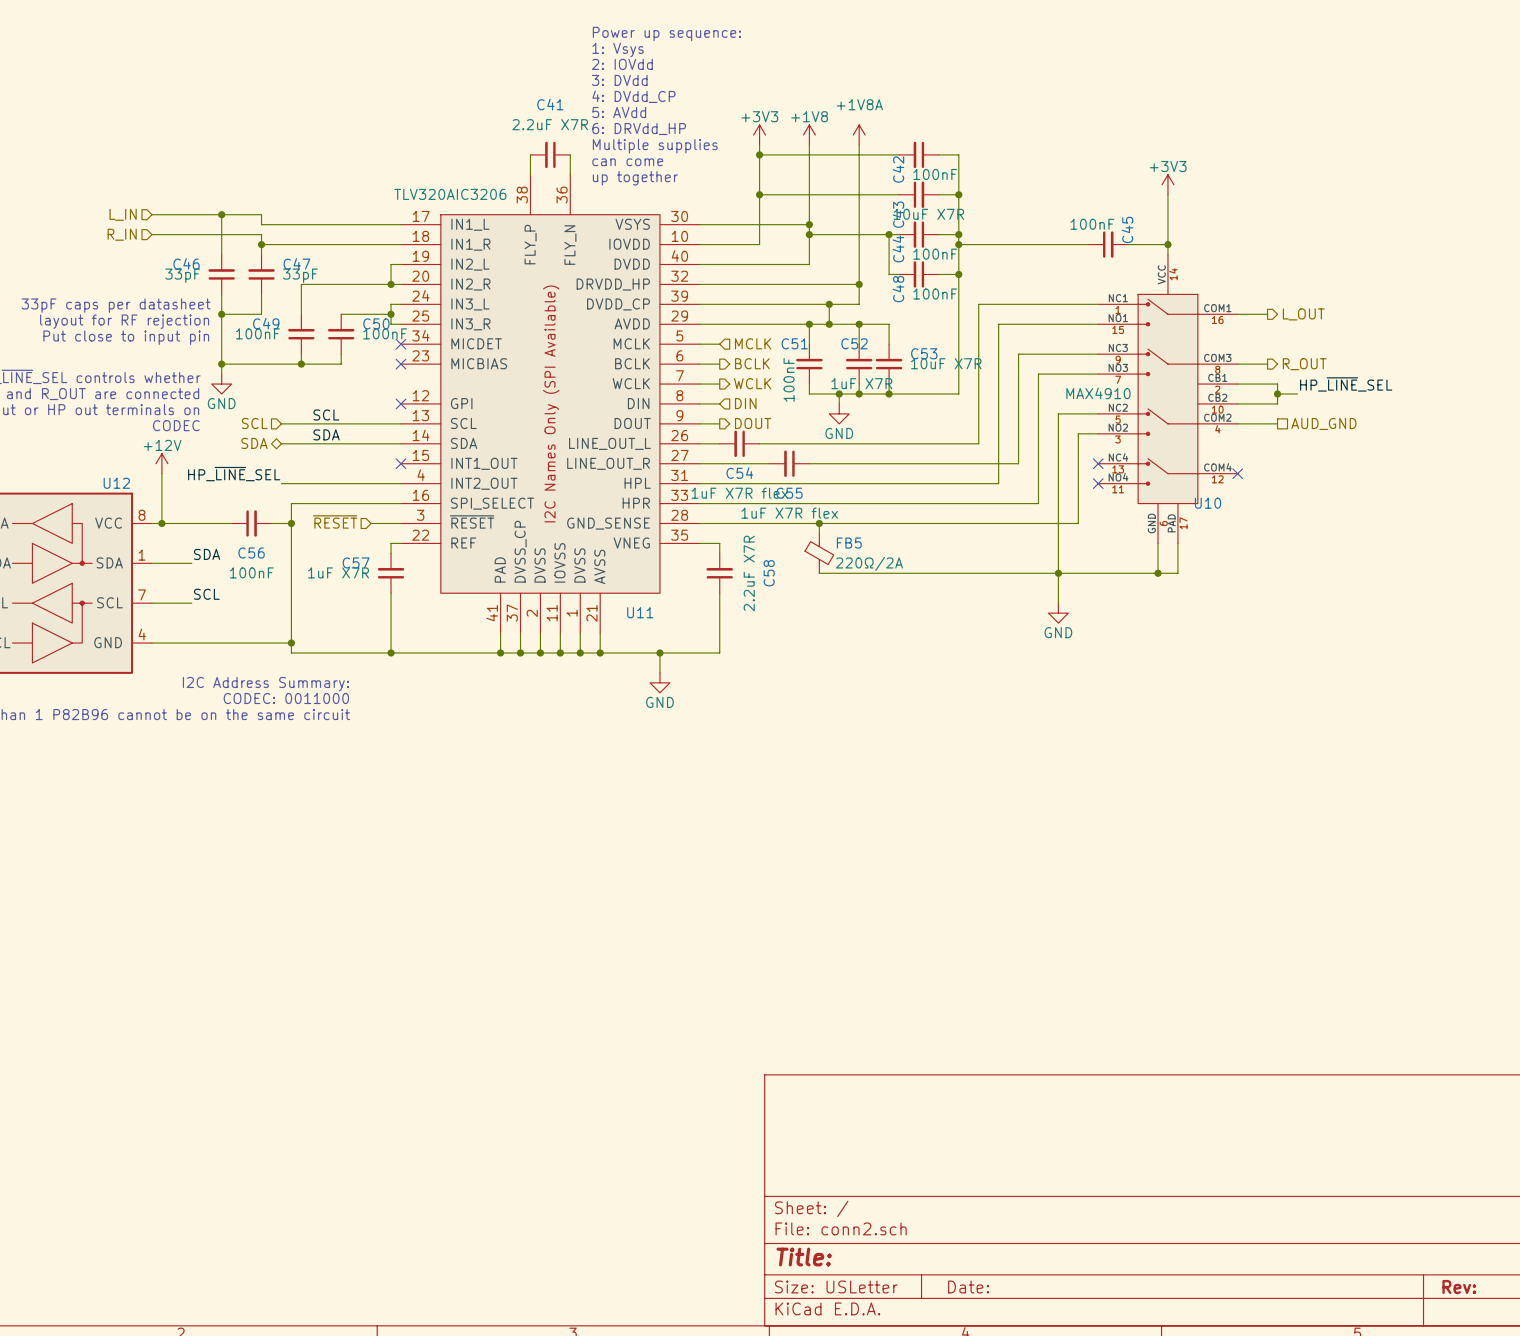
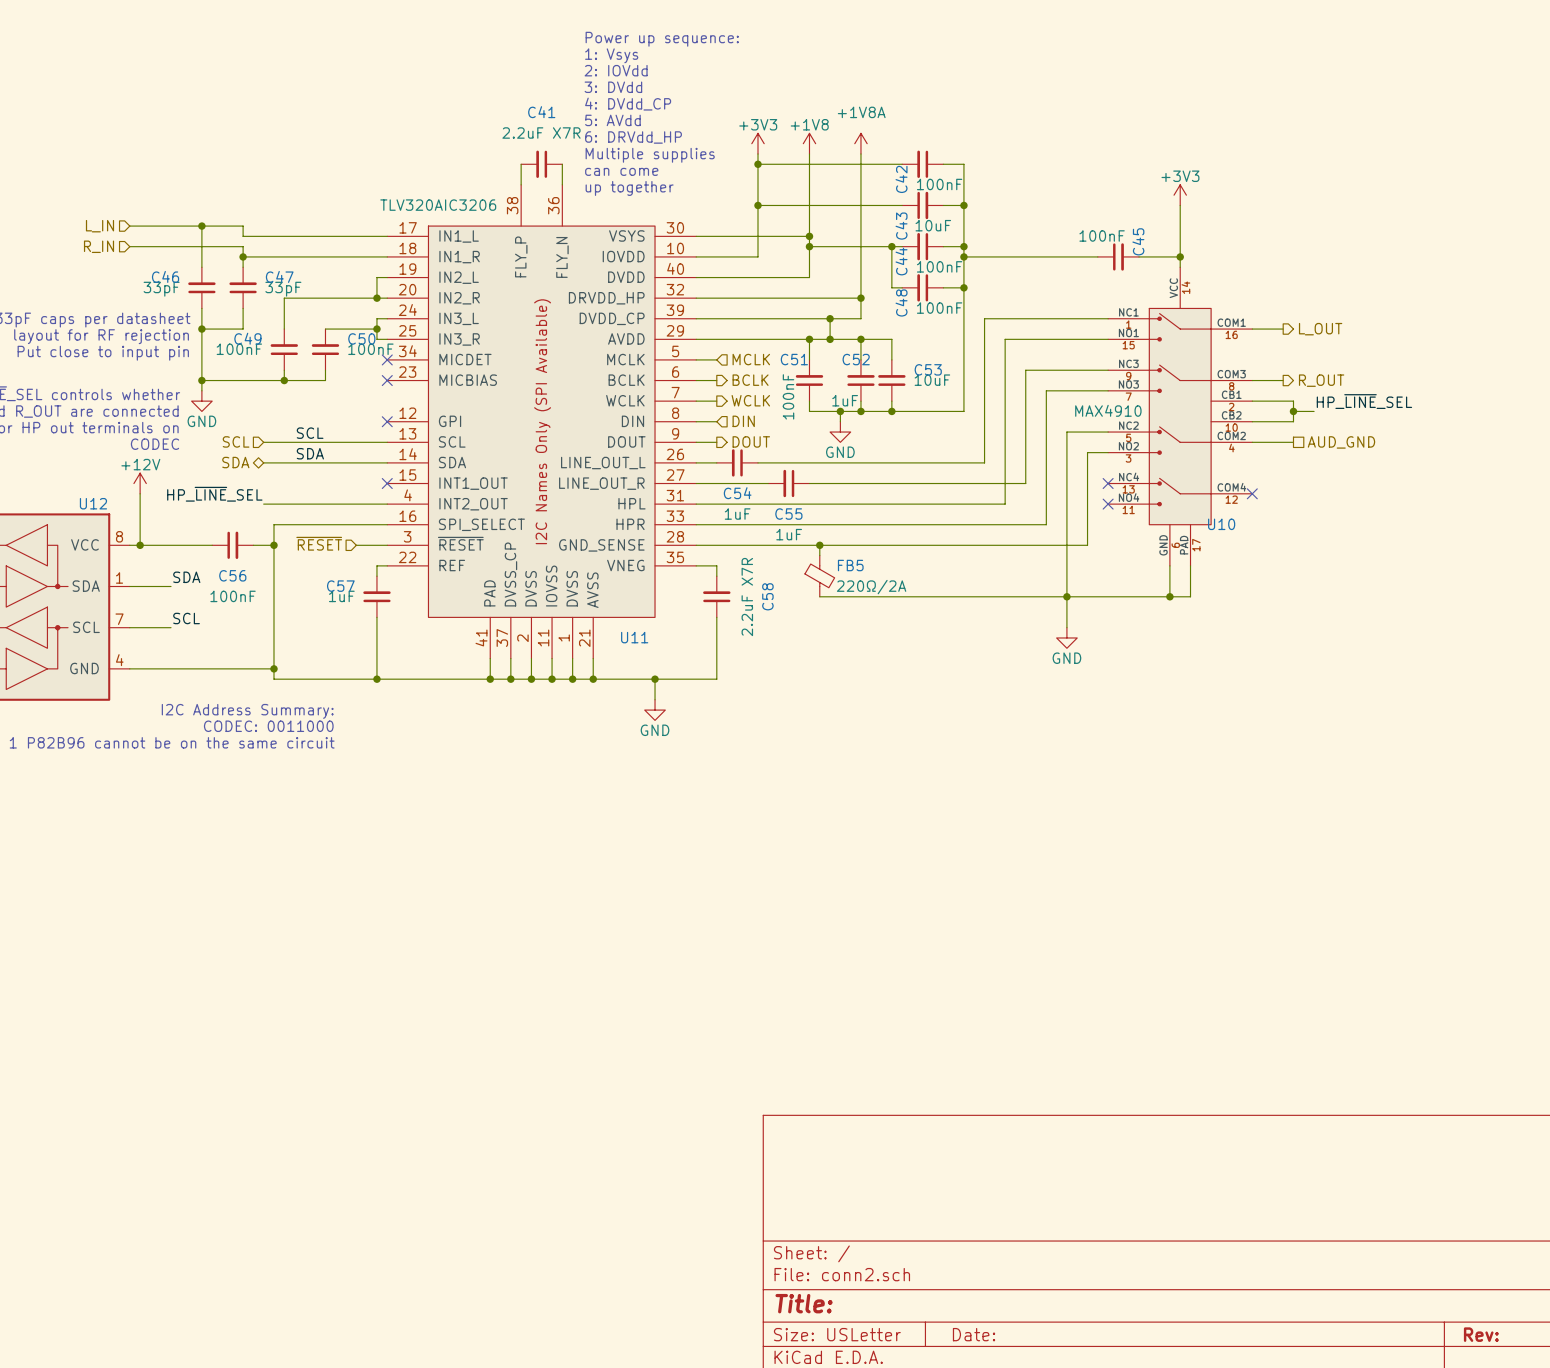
C43 value: 10uF X7R (928, 214) -> 10uF (933, 225)
C53 value: 10uF X7R (946, 363) -> 10uF (932, 380)
C52 value: 1uF X7R (861, 383) -> 1uF (845, 400)
C54 value: 1uF X7R flex (739, 493) -> 1uF (737, 514)
C55 value: 1uF X7R flex (789, 513) -> 1uF (789, 534)
C57 value: 1uF X7R (338, 572) -> 1uF (341, 596)

